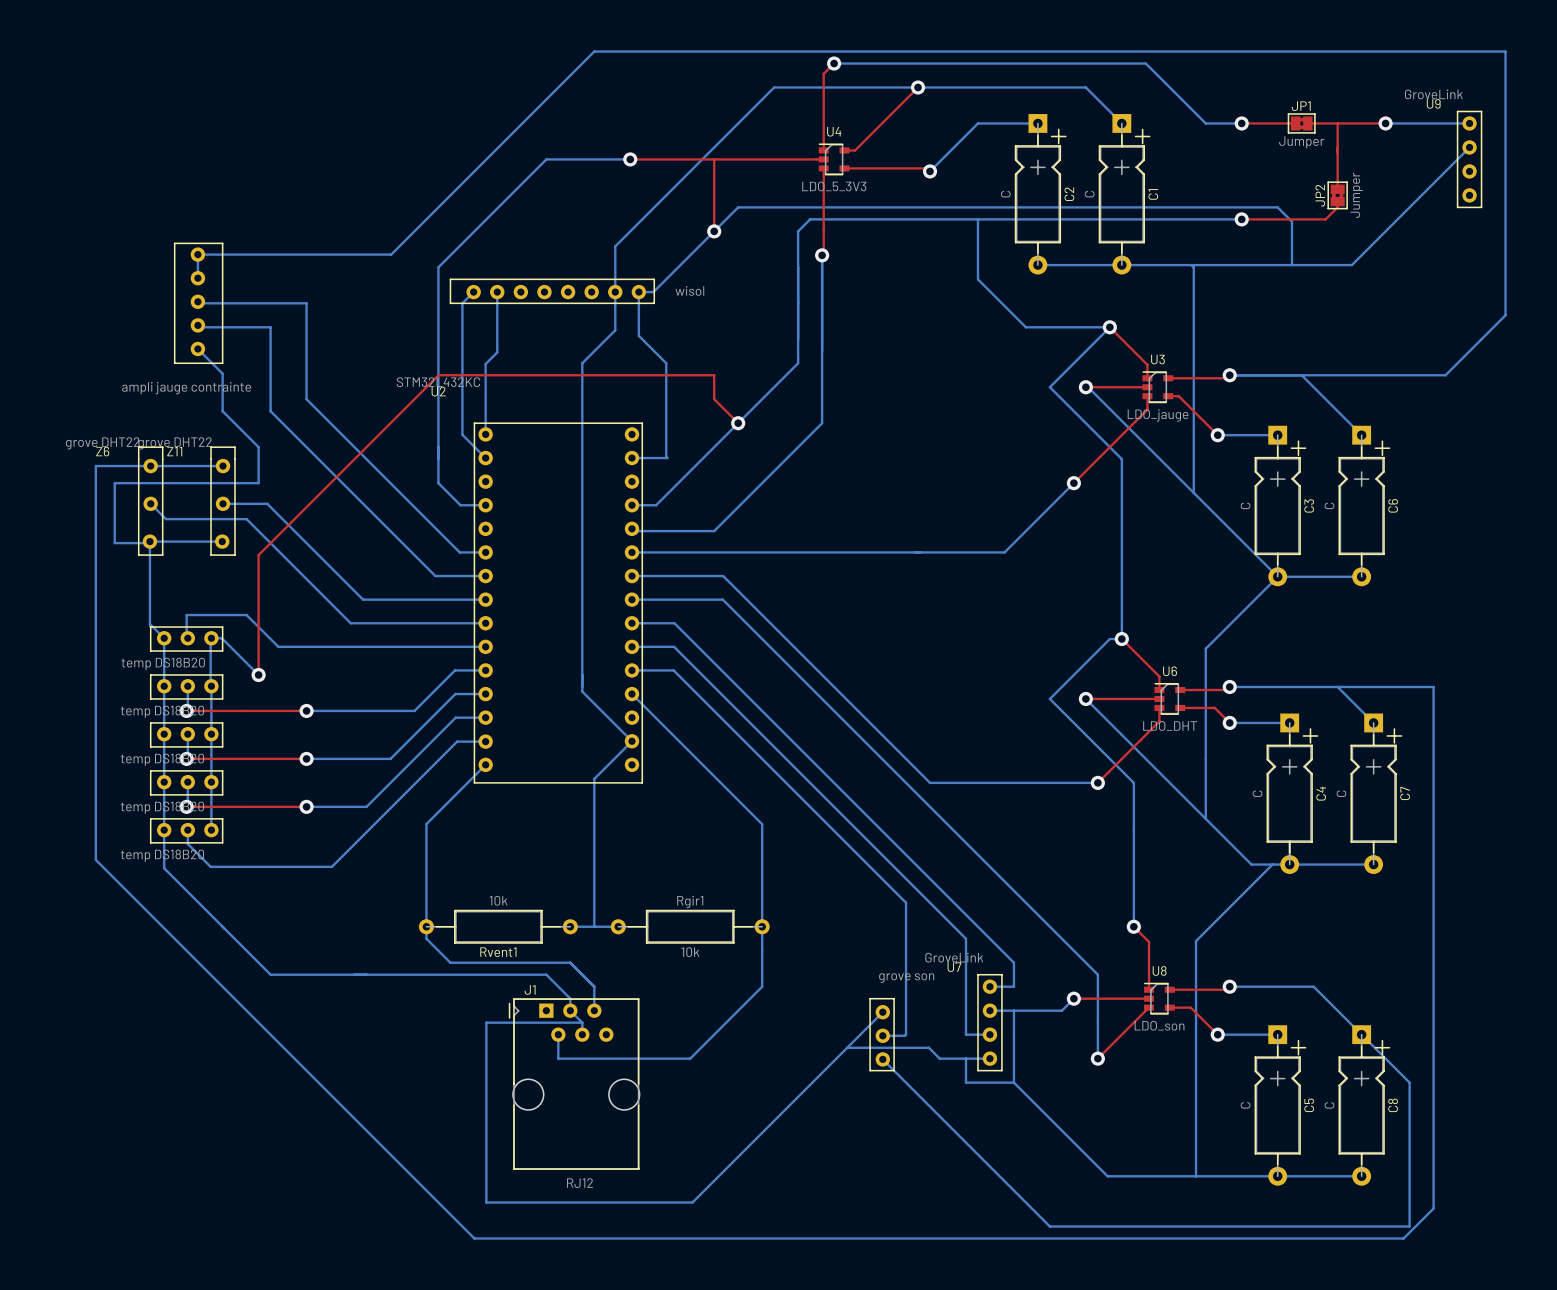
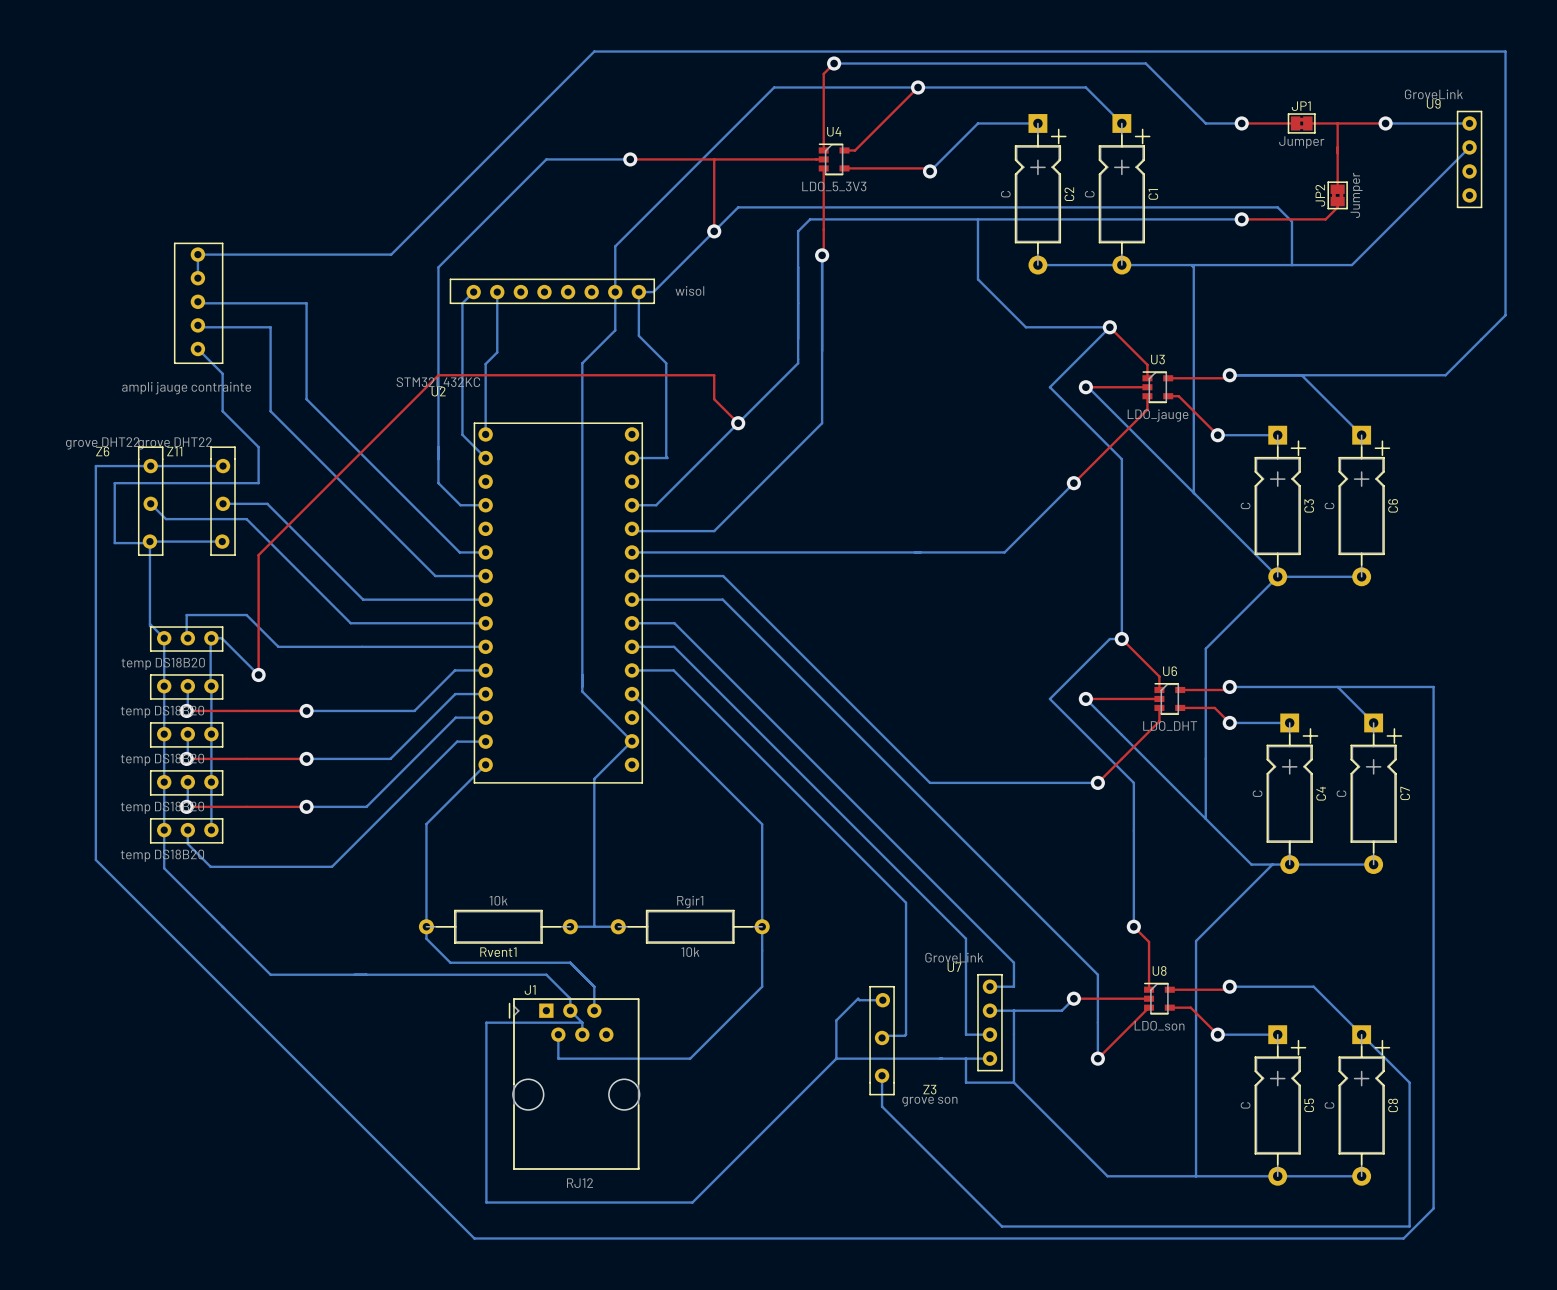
bottom track: (882, 1012) (836, 1058) -> none
part: grove son (882, 1034) -> none
Z3: none -> grove son (882, 1040)
bottom track: (847, 1047) (928, 1047) (939, 1058) -> (882, 1000) (858, 998) (836, 1020) (836, 1058) (939, 1058)
bottom track: (882, 1059) (1049, 1226) -> (882, 1075) (882, 1106) (1001, 1226) (1049, 1226)

